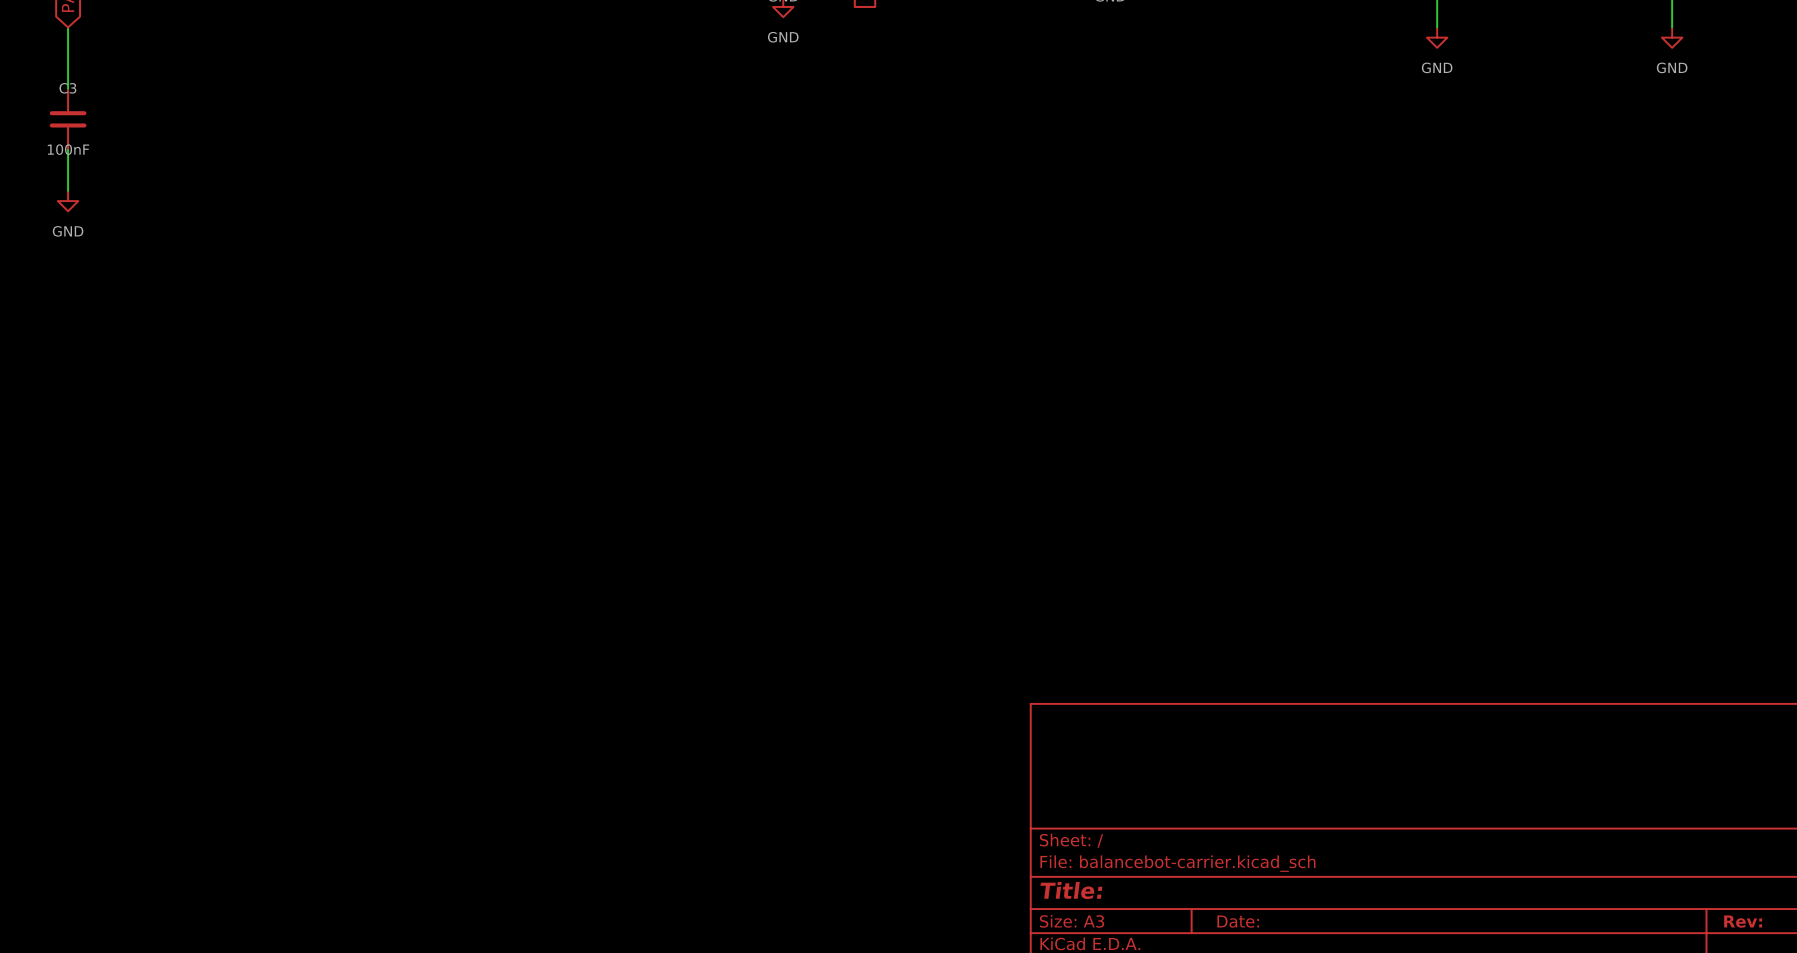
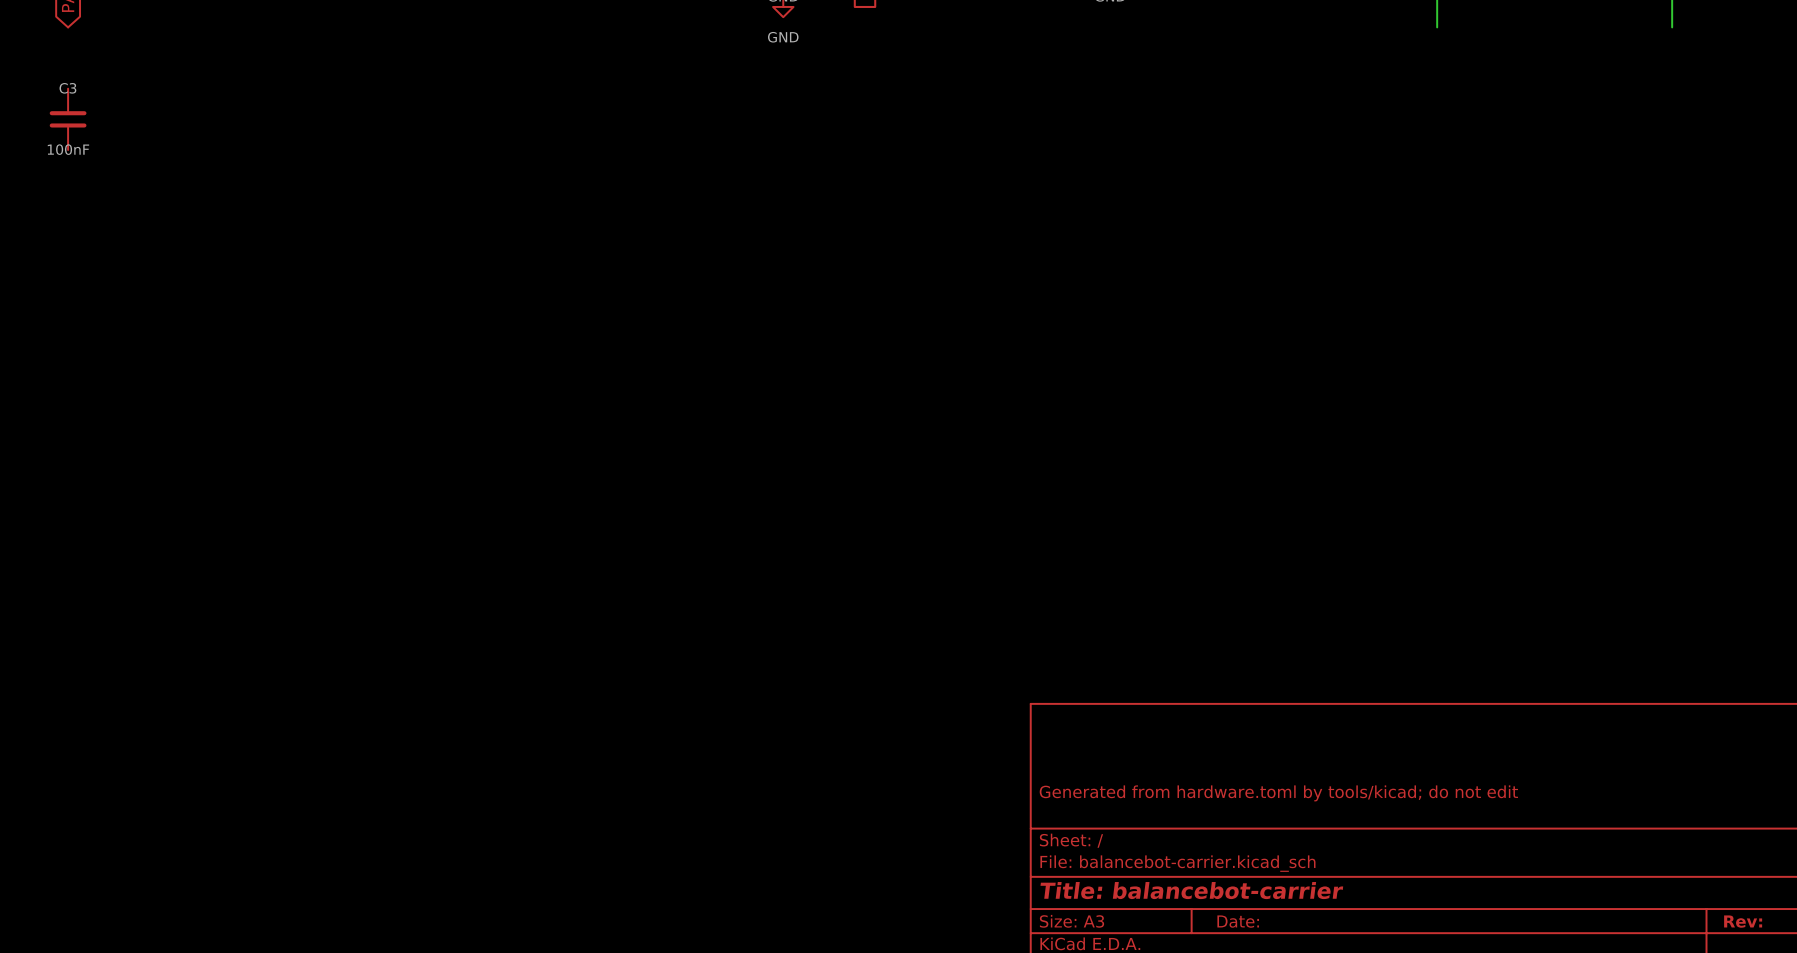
wire: (68, 27) (68, 88) -> none
power symbol: GND (1437, 37) -> none
power symbol: GND (1672, 37) -> none
wire: (68, 150) (68, 190) -> none
power symbol: GND (68, 201) -> none
title block: none -> Generated from hardware.toml by tools/kicad; do not edit (1278, 793)
title block: Title: (1071, 890) -> Title: balancebot-carrier (1191, 890)

